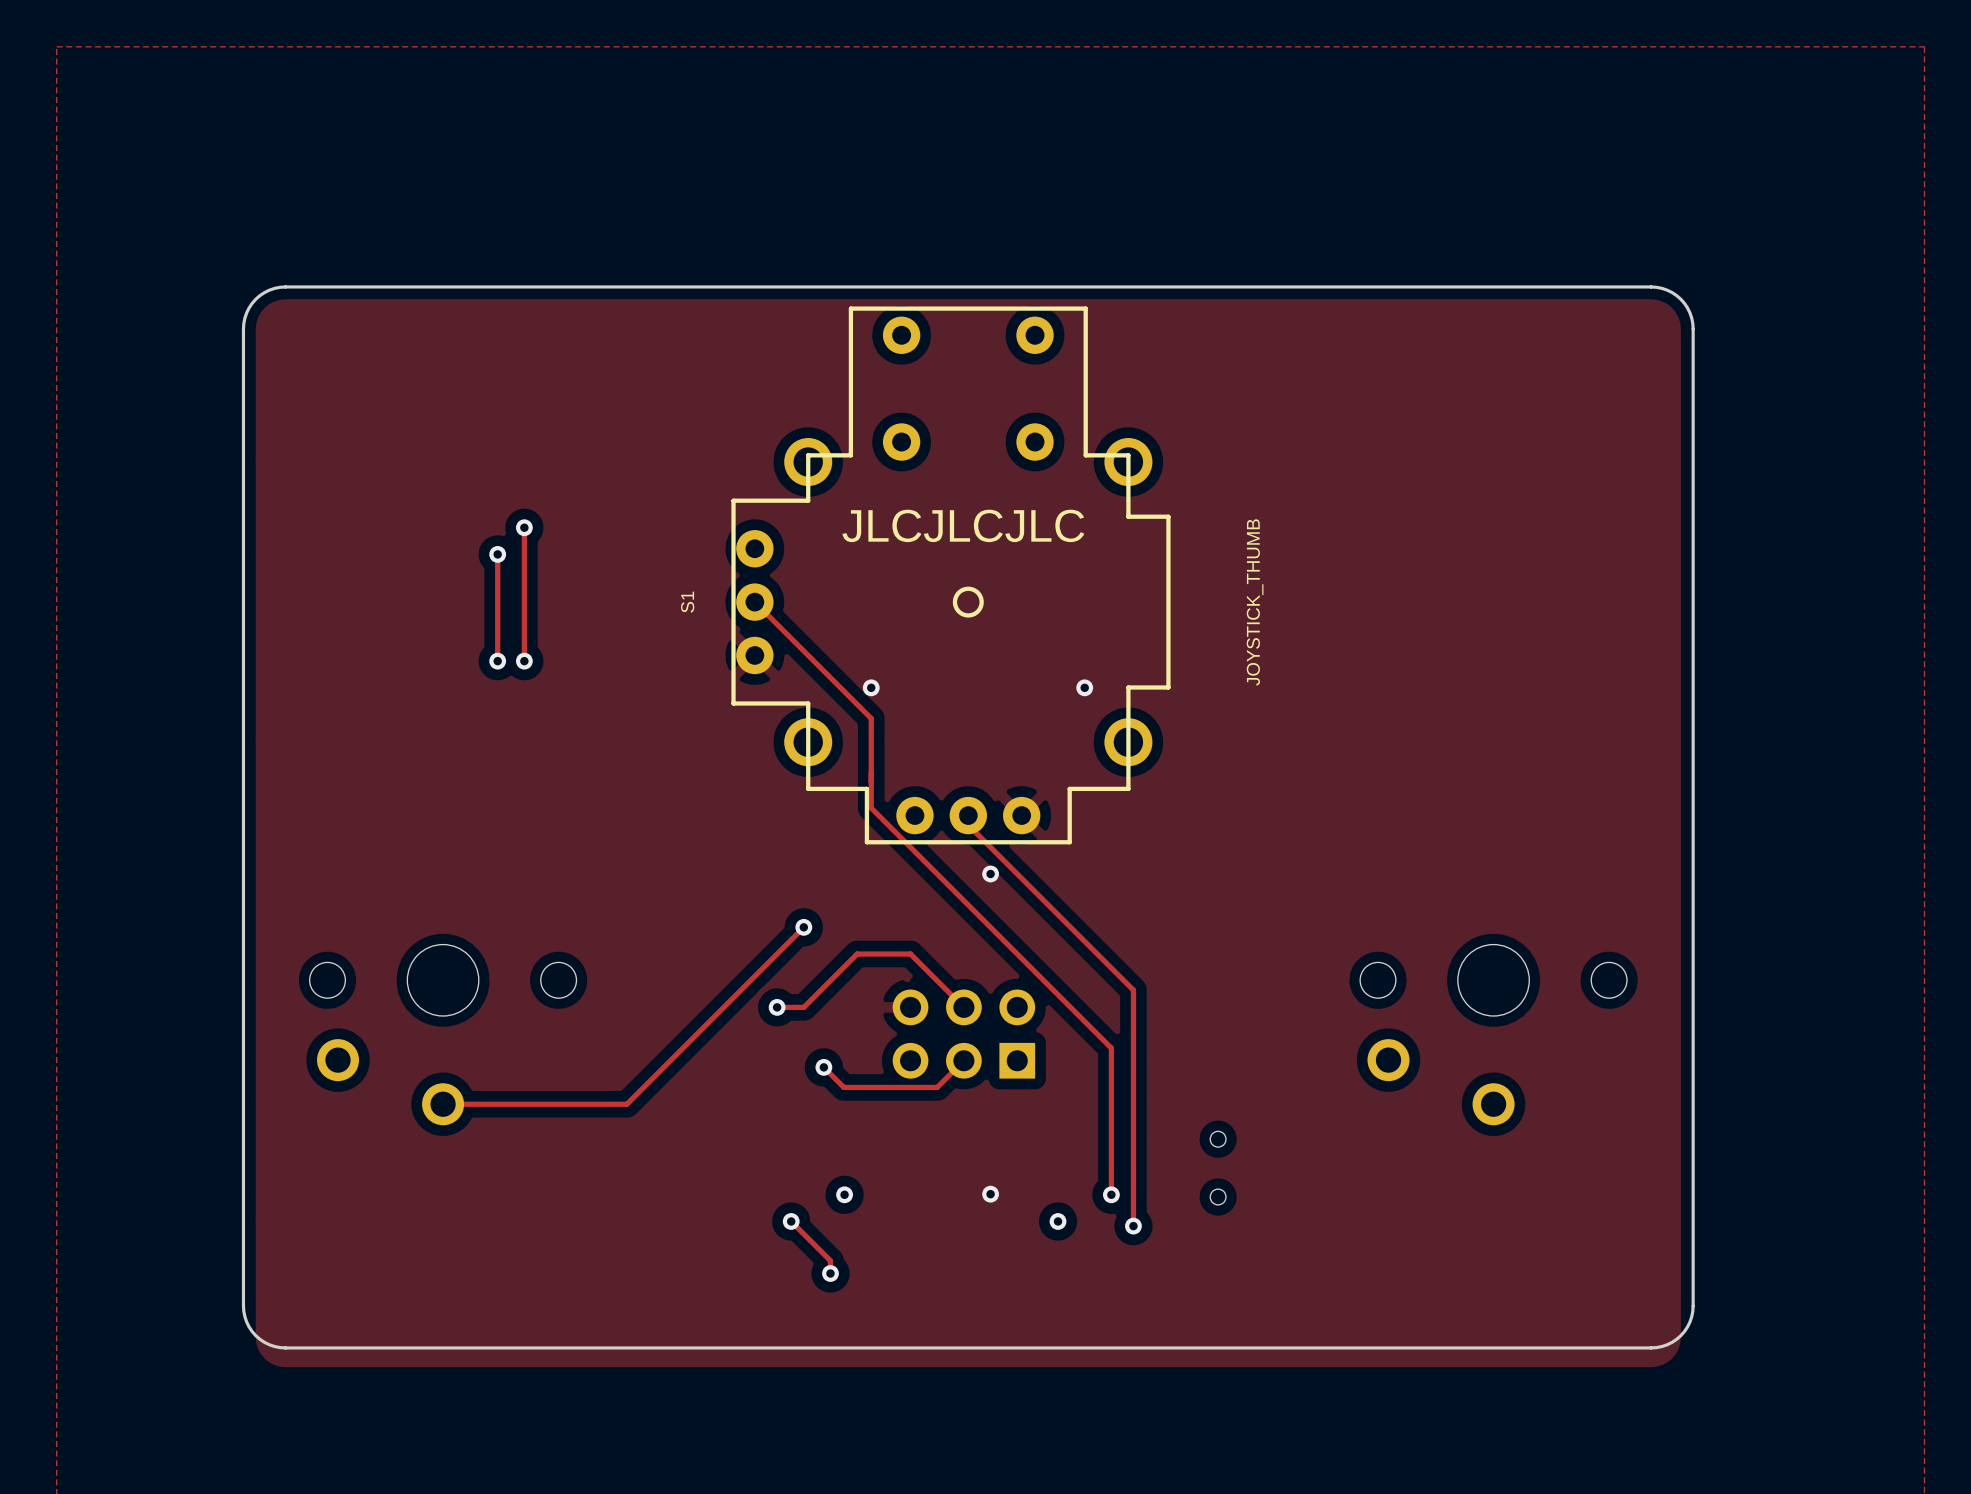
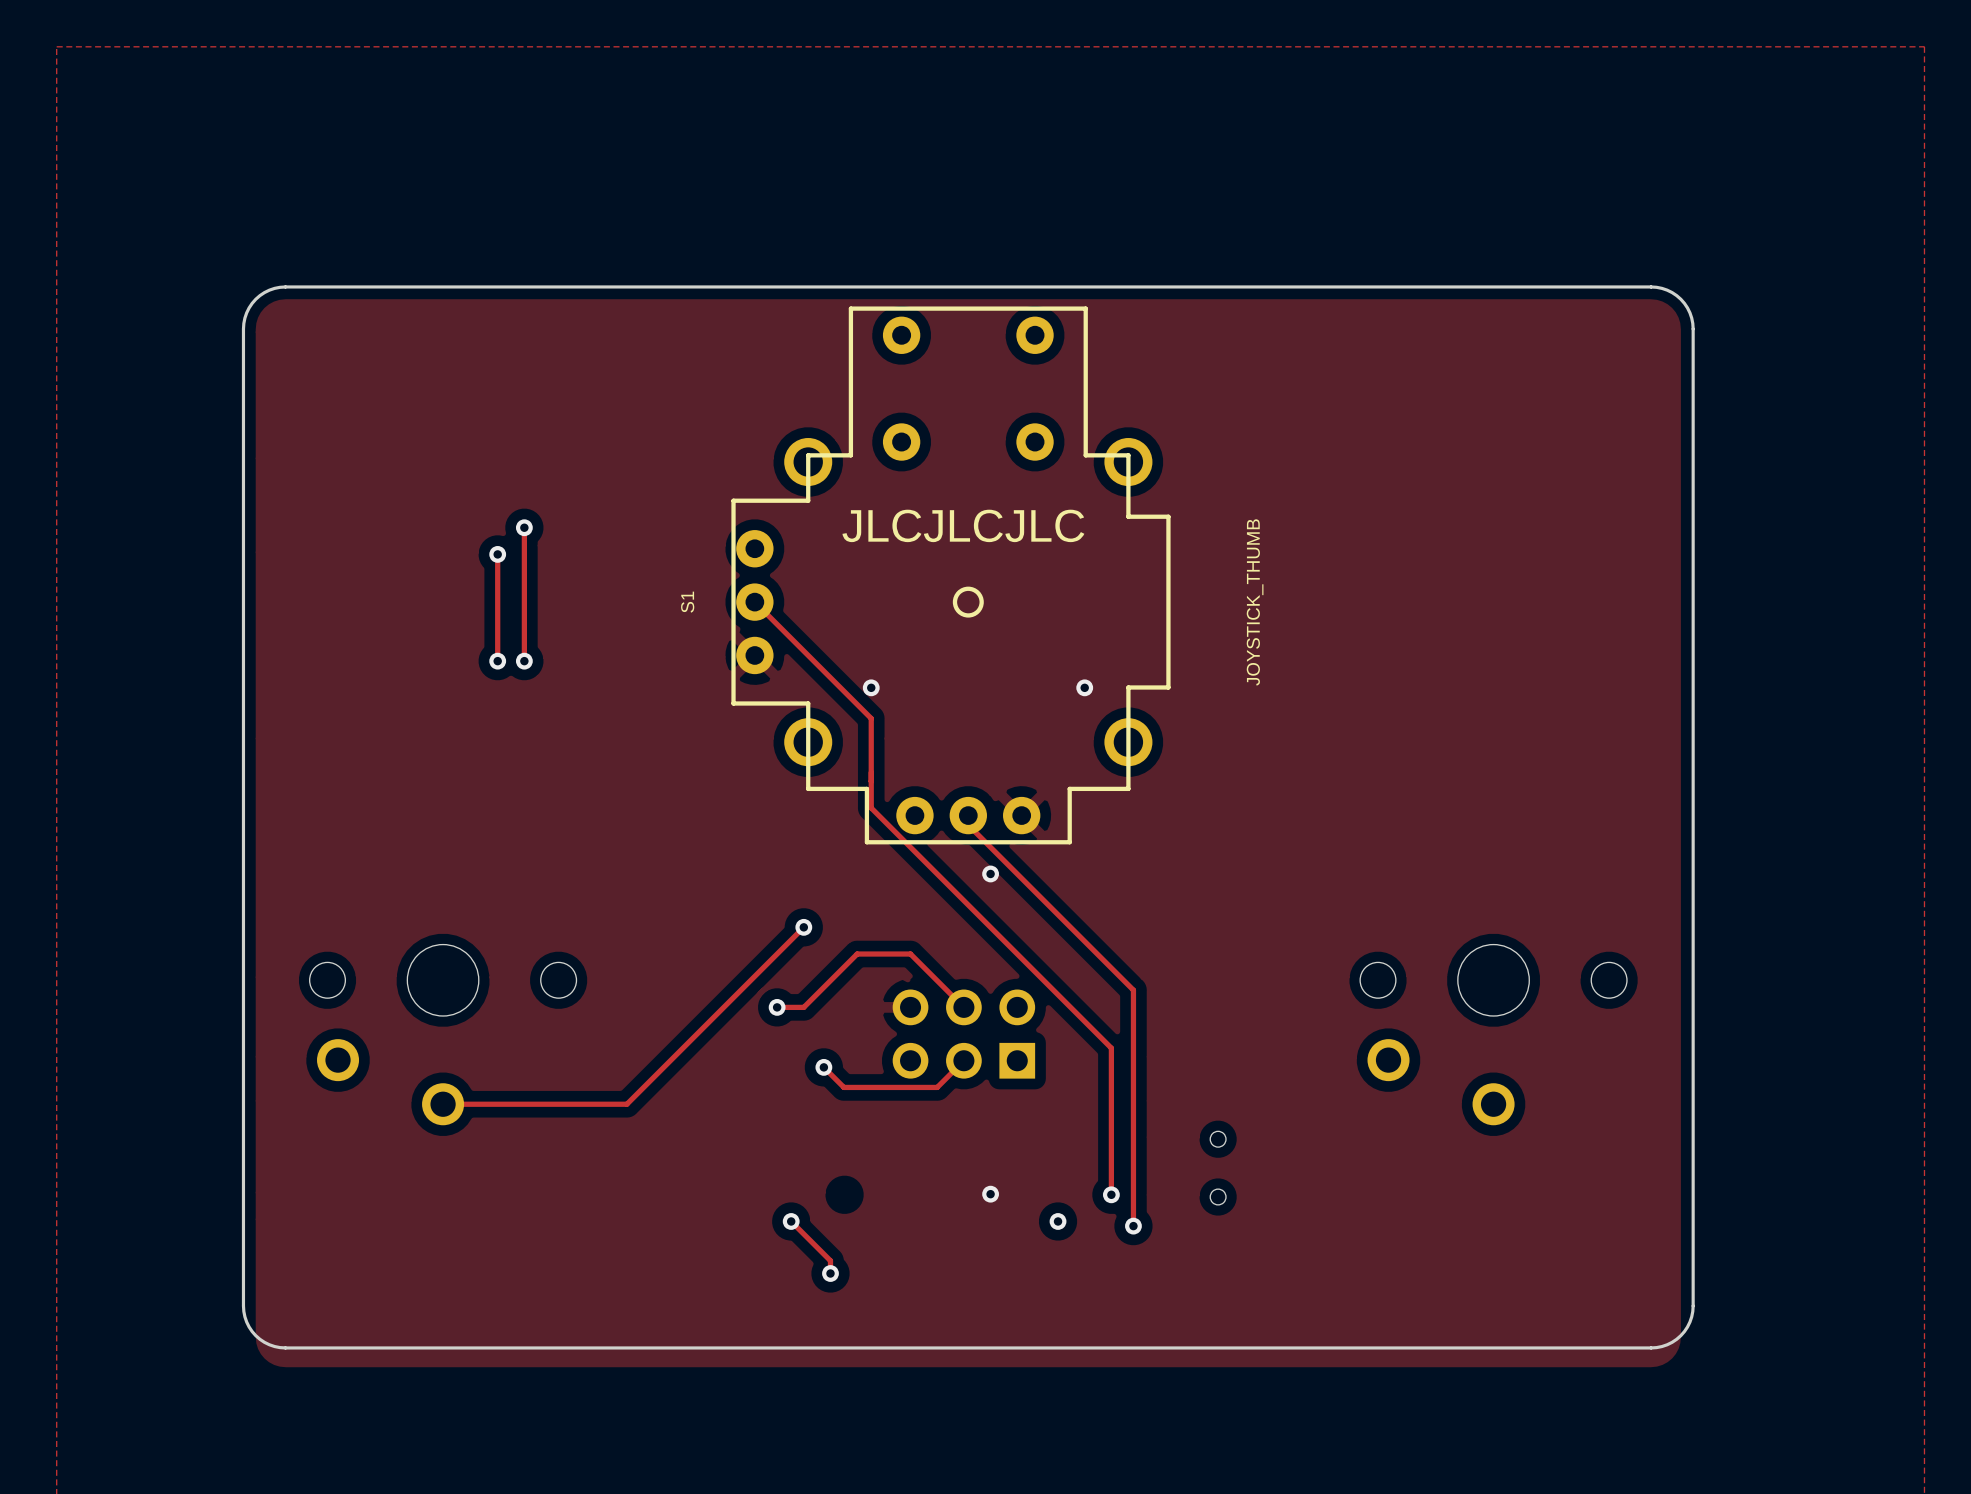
via: (844, 1194) -> none

